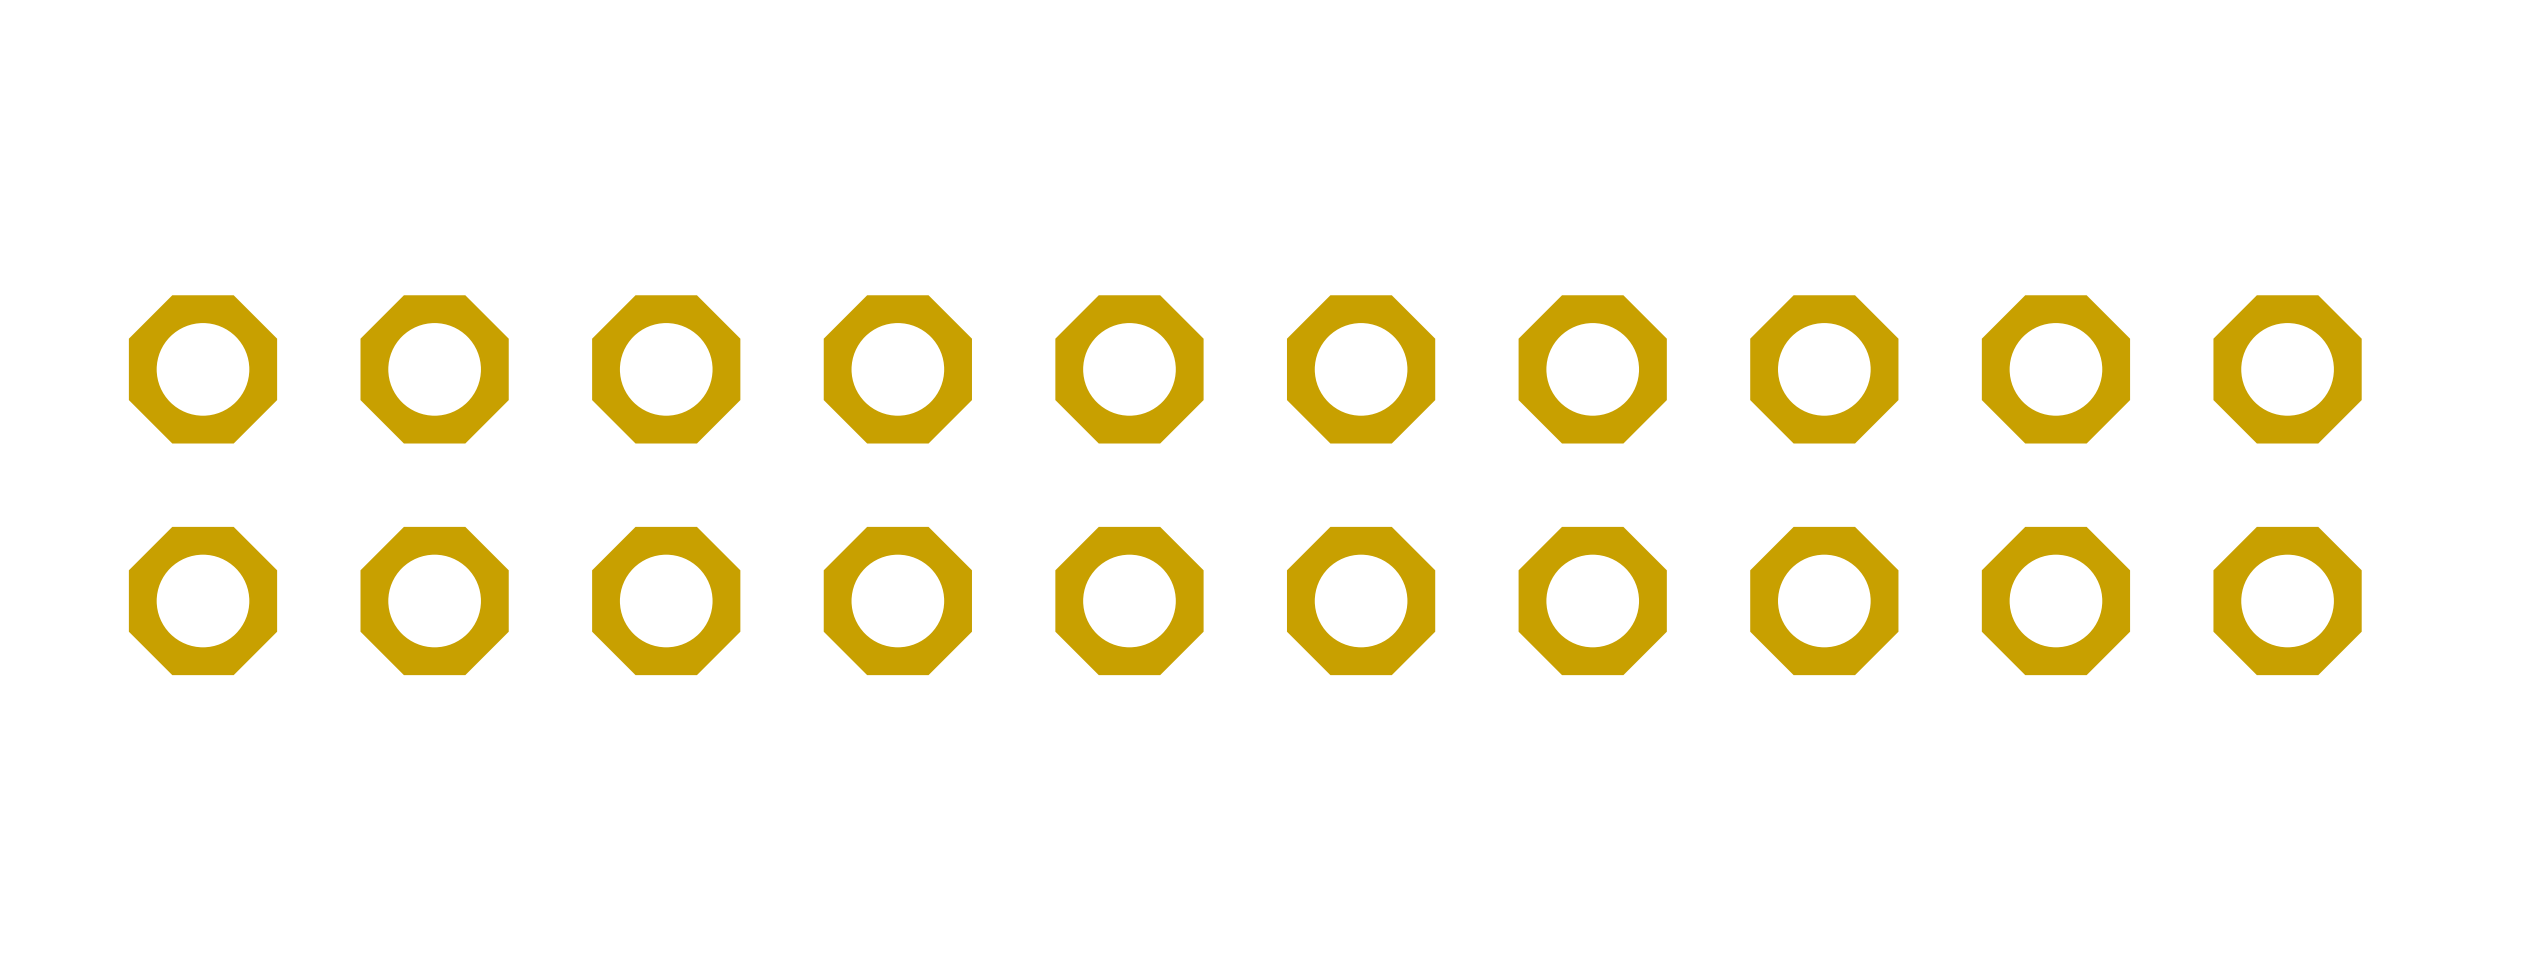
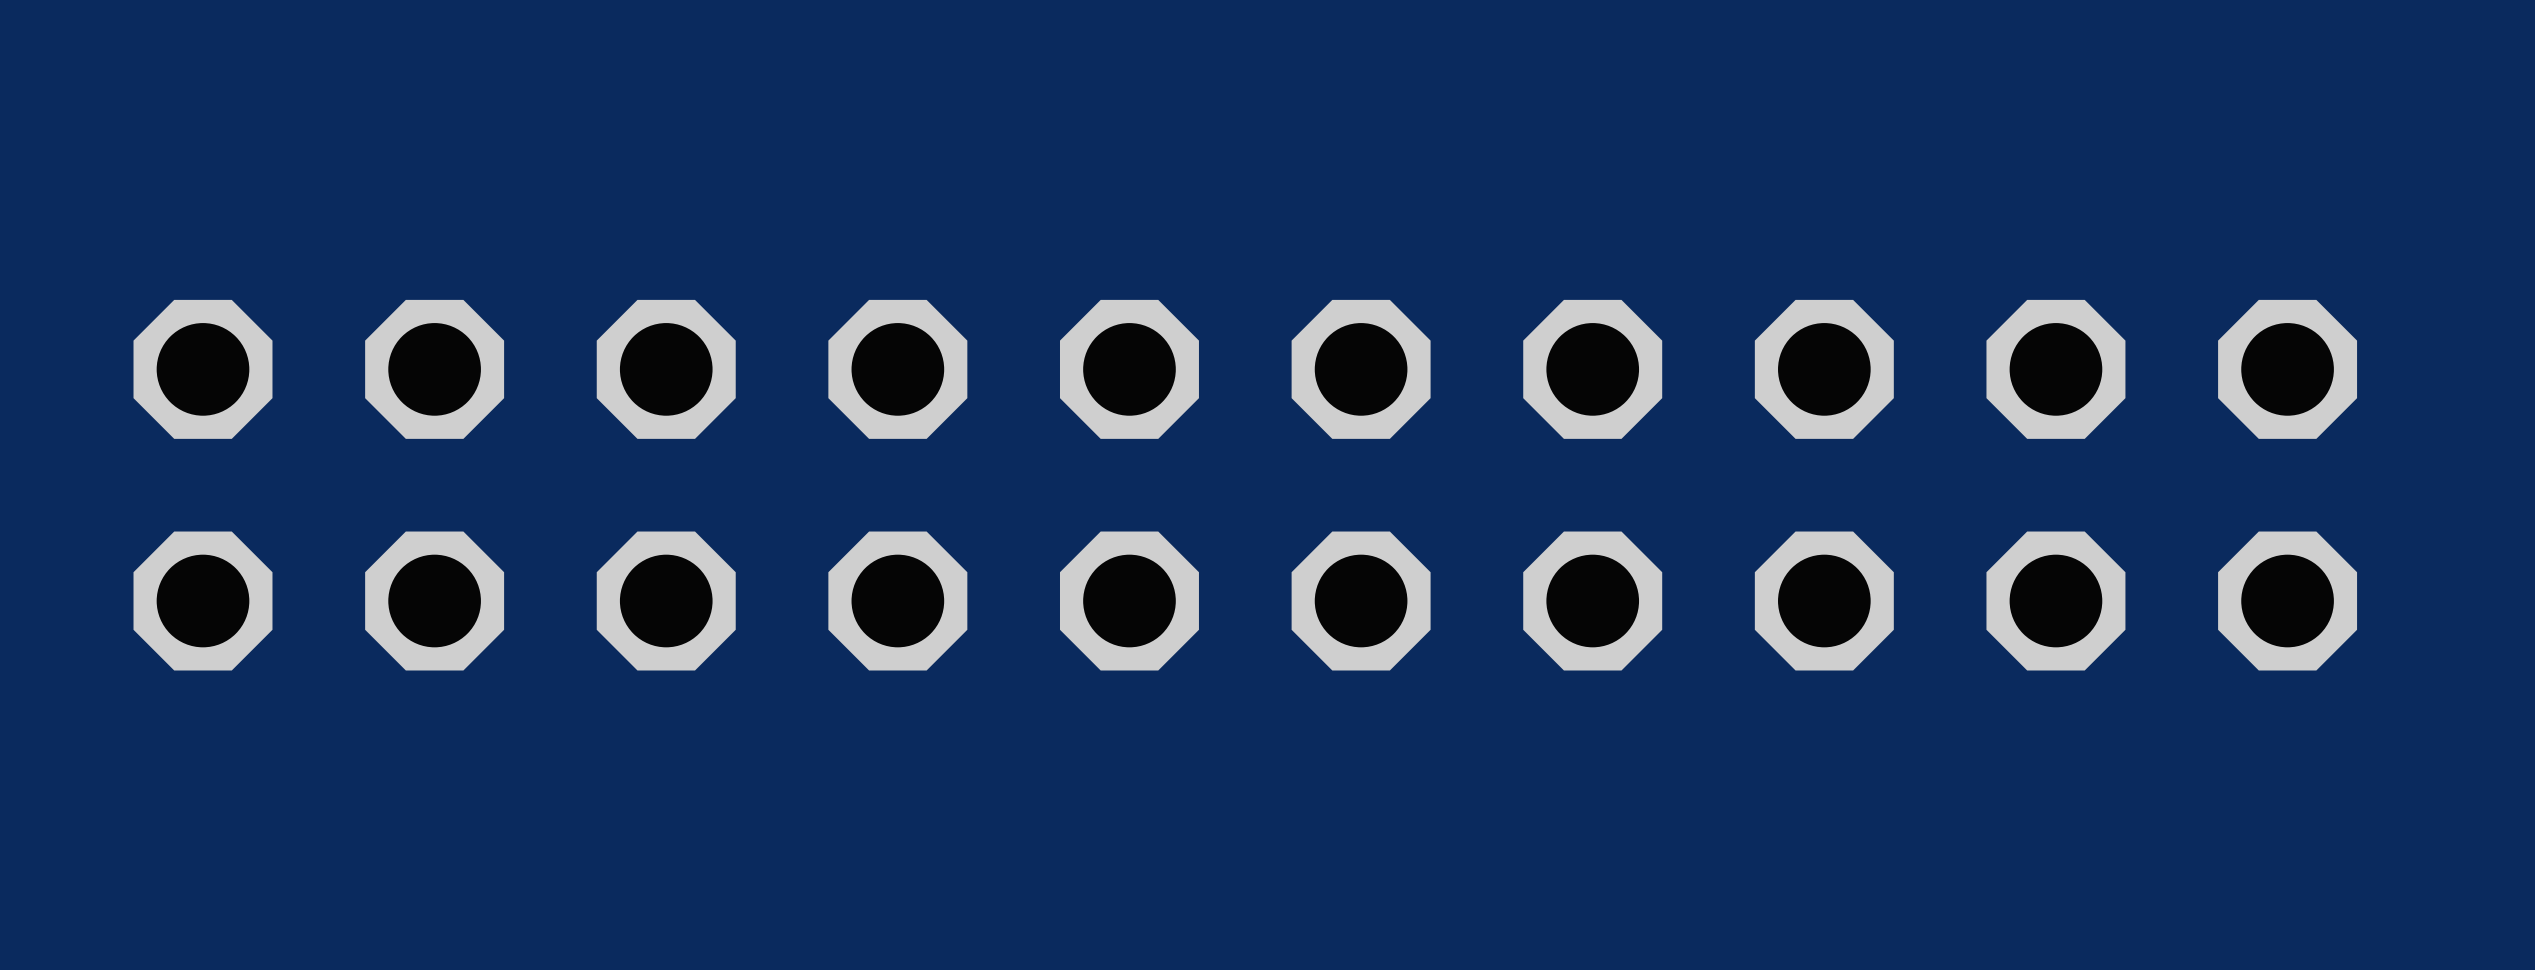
part footprint: [128, 295, 2362, 676] -> [133, 299, 2358, 671]

